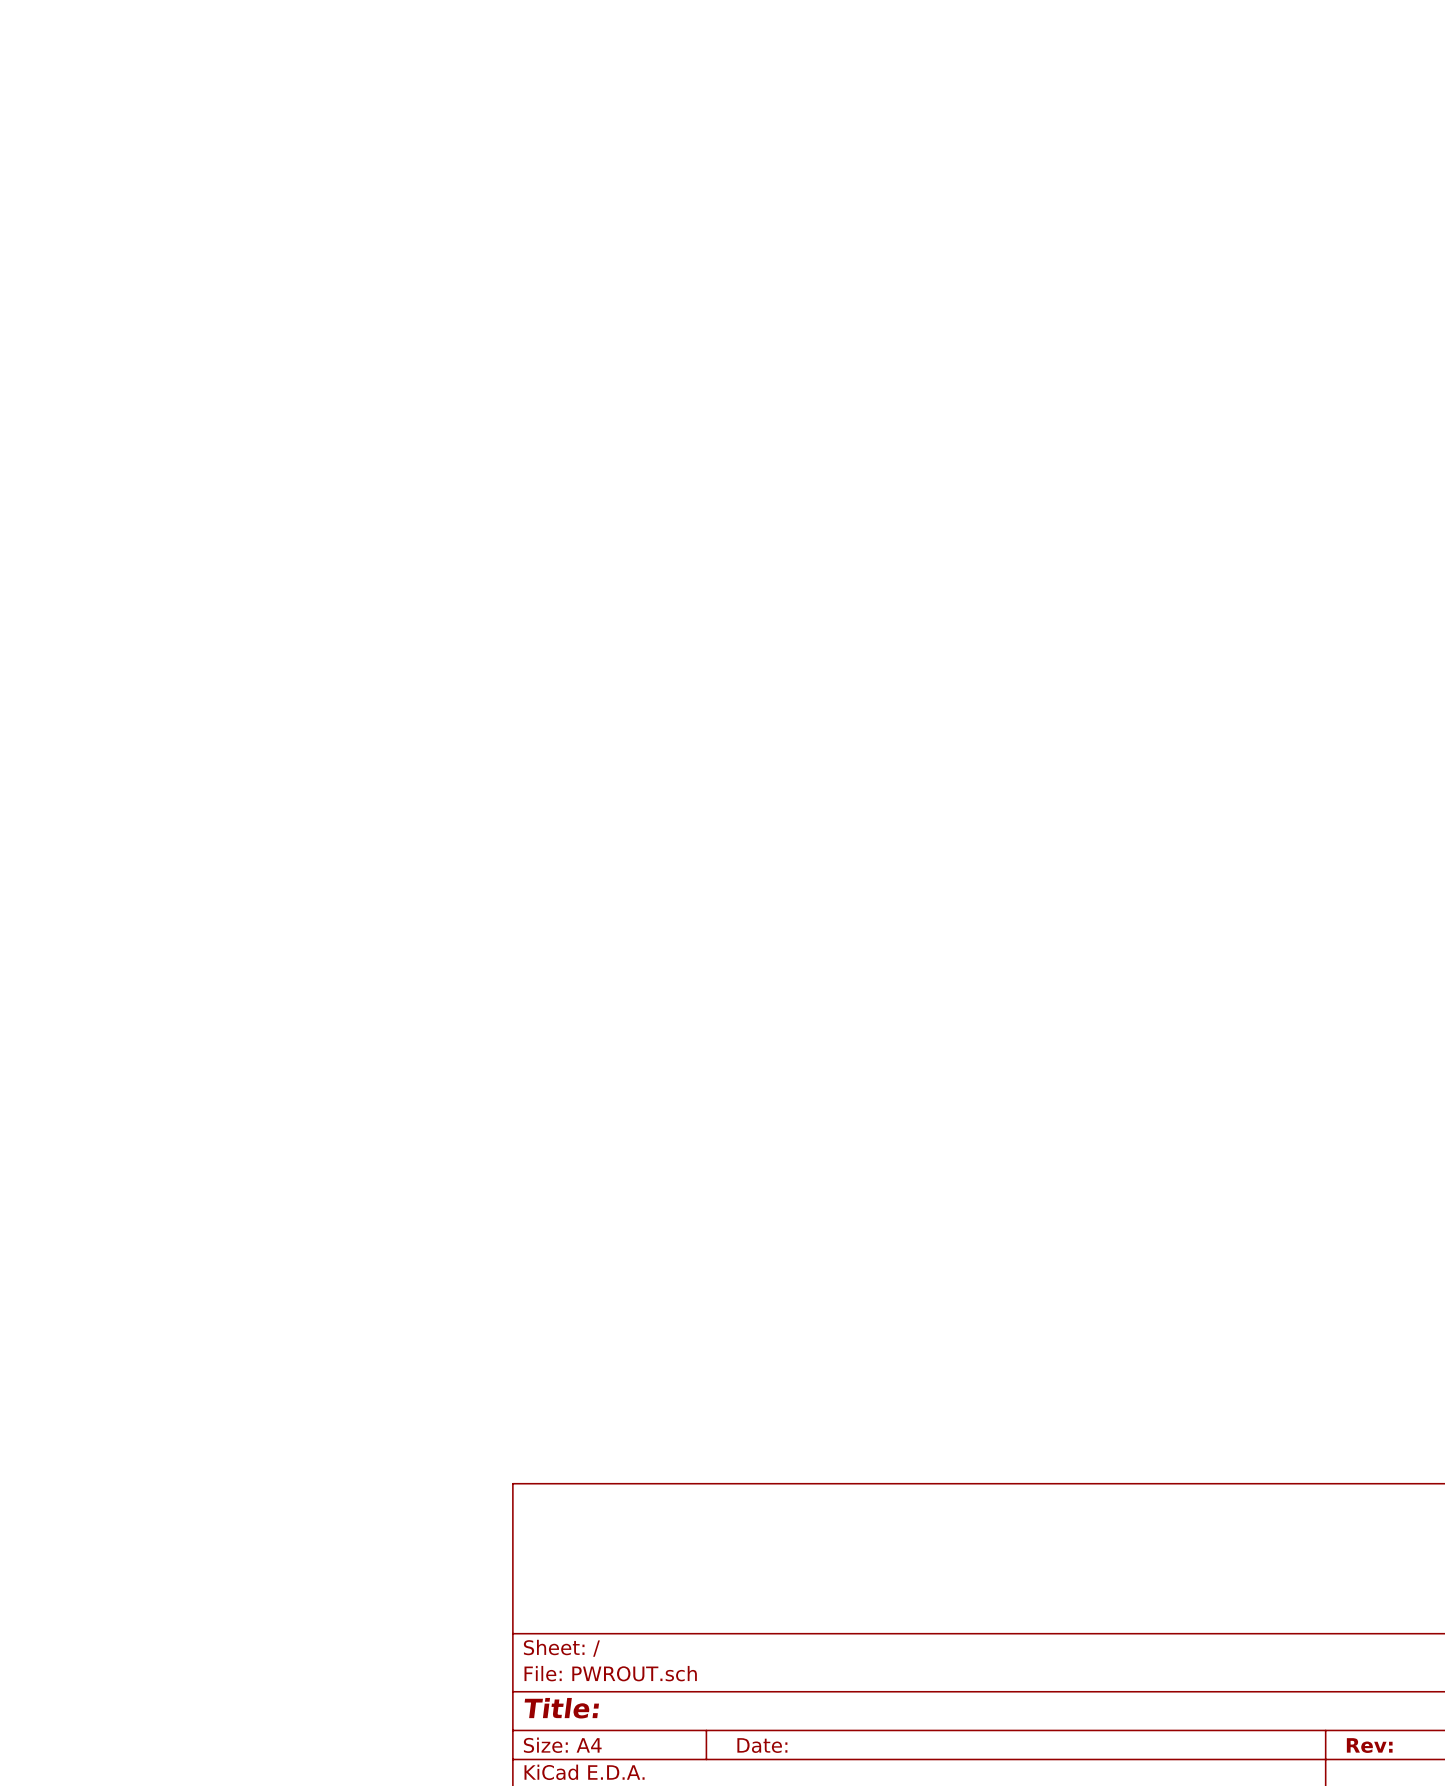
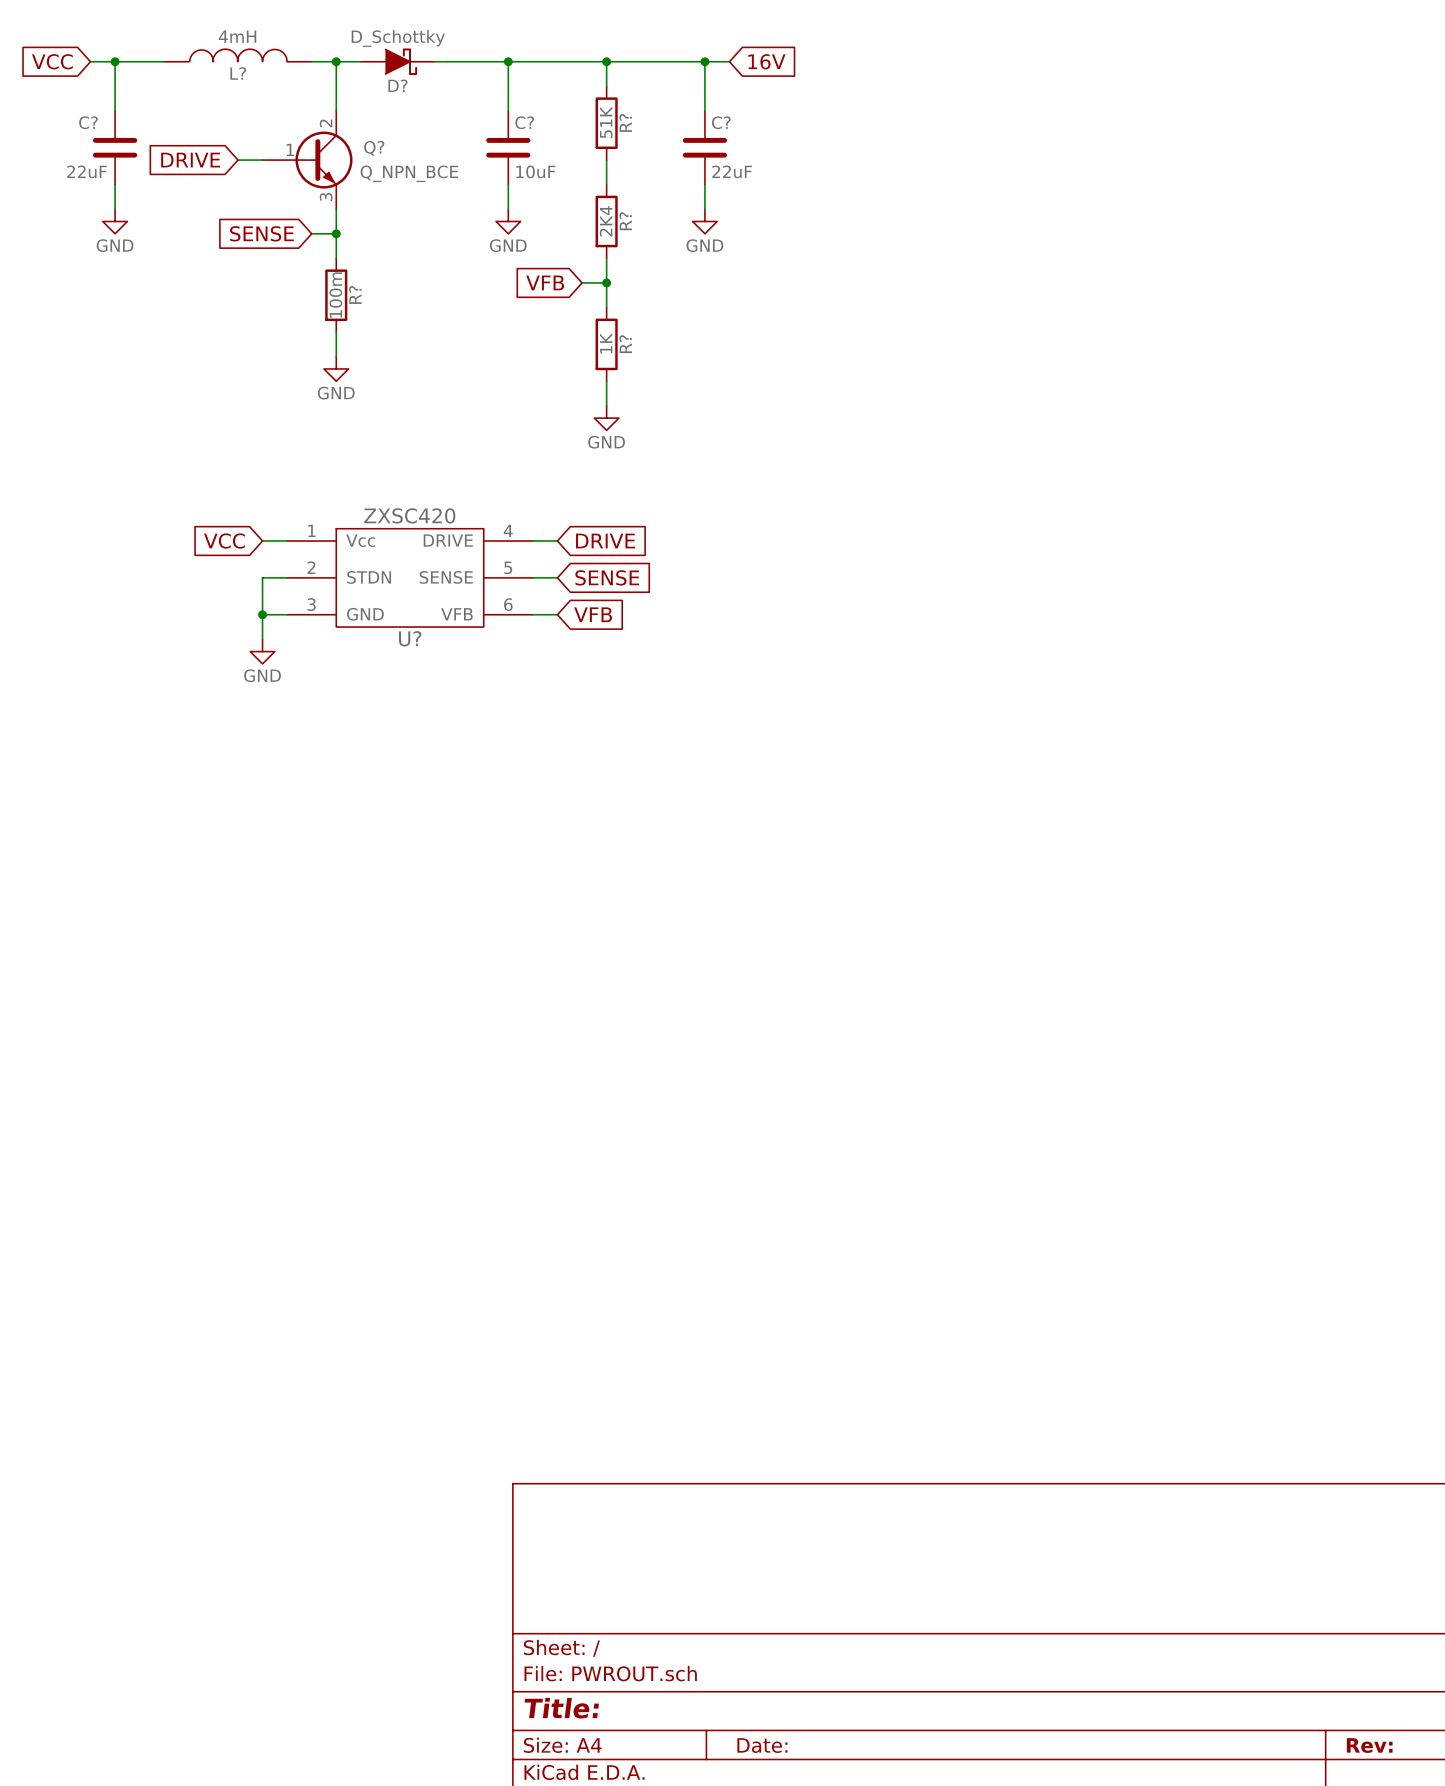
L?: none -> 4mH (237, 55)
global label: none -> VCC (52, 61)
wire: none -> (90, 61) (164, 61)
wire: none -> (115, 61) (115, 110)
junction: none -> (115, 61)
wire: none -> (311, 61) (360, 61)
wire: none -> (336, 61) (336, 110)
junction: none -> (336, 61)
D?: none -> D_Schottky (397, 61)
wire: none -> (434, 61) (729, 61)
wire: none -> (508, 61) (508, 110)
junction: none -> (508, 61)
wire: none -> (606, 61) (606, 86)
junction: none -> (606, 61)
wire: none -> (704, 61) (704, 110)
junction: none -> (704, 61)
global label: none -> 16V (766, 61)
R?: none -> 51K (606, 123)
C?: none -> 22uF (115, 147)
C?: none -> 10uF (508, 147)
C?: none -> 22uF (704, 147)
global label: none -> DRIVE (190, 160)
wire: none -> (237, 160) (262, 160)
Q?: none -> Q_NPN_BCE (307, 160)
wire: none -> (606, 160) (606, 184)
wire: none -> (115, 184) (115, 209)
wire: none -> (508, 184) (508, 209)
wire: none -> (704, 184) (704, 209)
wire: none -> (336, 209) (336, 258)
power symbol: none -> GND (115, 221)
power symbol: none -> GND (508, 221)
R?: none -> 2K4 (606, 221)
power symbol: none -> GND (704, 221)
global label: none -> SENSE (261, 233)
wire: none -> (311, 233) (336, 233)
junction: none -> (336, 233)
wire: none -> (606, 258) (606, 307)
global label: none -> VFB (545, 282)
wire: none -> (582, 282) (606, 282)
junction: none -> (606, 282)
R?: none -> 100m (336, 295)
wire: none -> (336, 332) (336, 356)
R?: none -> 1K (606, 344)
power symbol: none -> GND (336, 368)
wire: none -> (606, 381) (606, 405)
power symbol: none -> GND (606, 418)
global label: none -> VCC (224, 541)
wire: none -> (262, 541) (287, 541)
wire: none -> (532, 541) (557, 541)
global label: none -> DRIVE (605, 541)
wire: none -> (287, 577) (262, 577) (262, 639)
U?: none -> ZXSC420 (410, 577)
wire: none -> (532, 577) (557, 577)
global label: none -> SENSE (607, 577)
wire: none -> (262, 614) (287, 614)
junction: none -> (262, 614)
wire: none -> (532, 614) (557, 614)
global label: none -> VFB (593, 614)
power symbol: none -> GND (262, 651)

